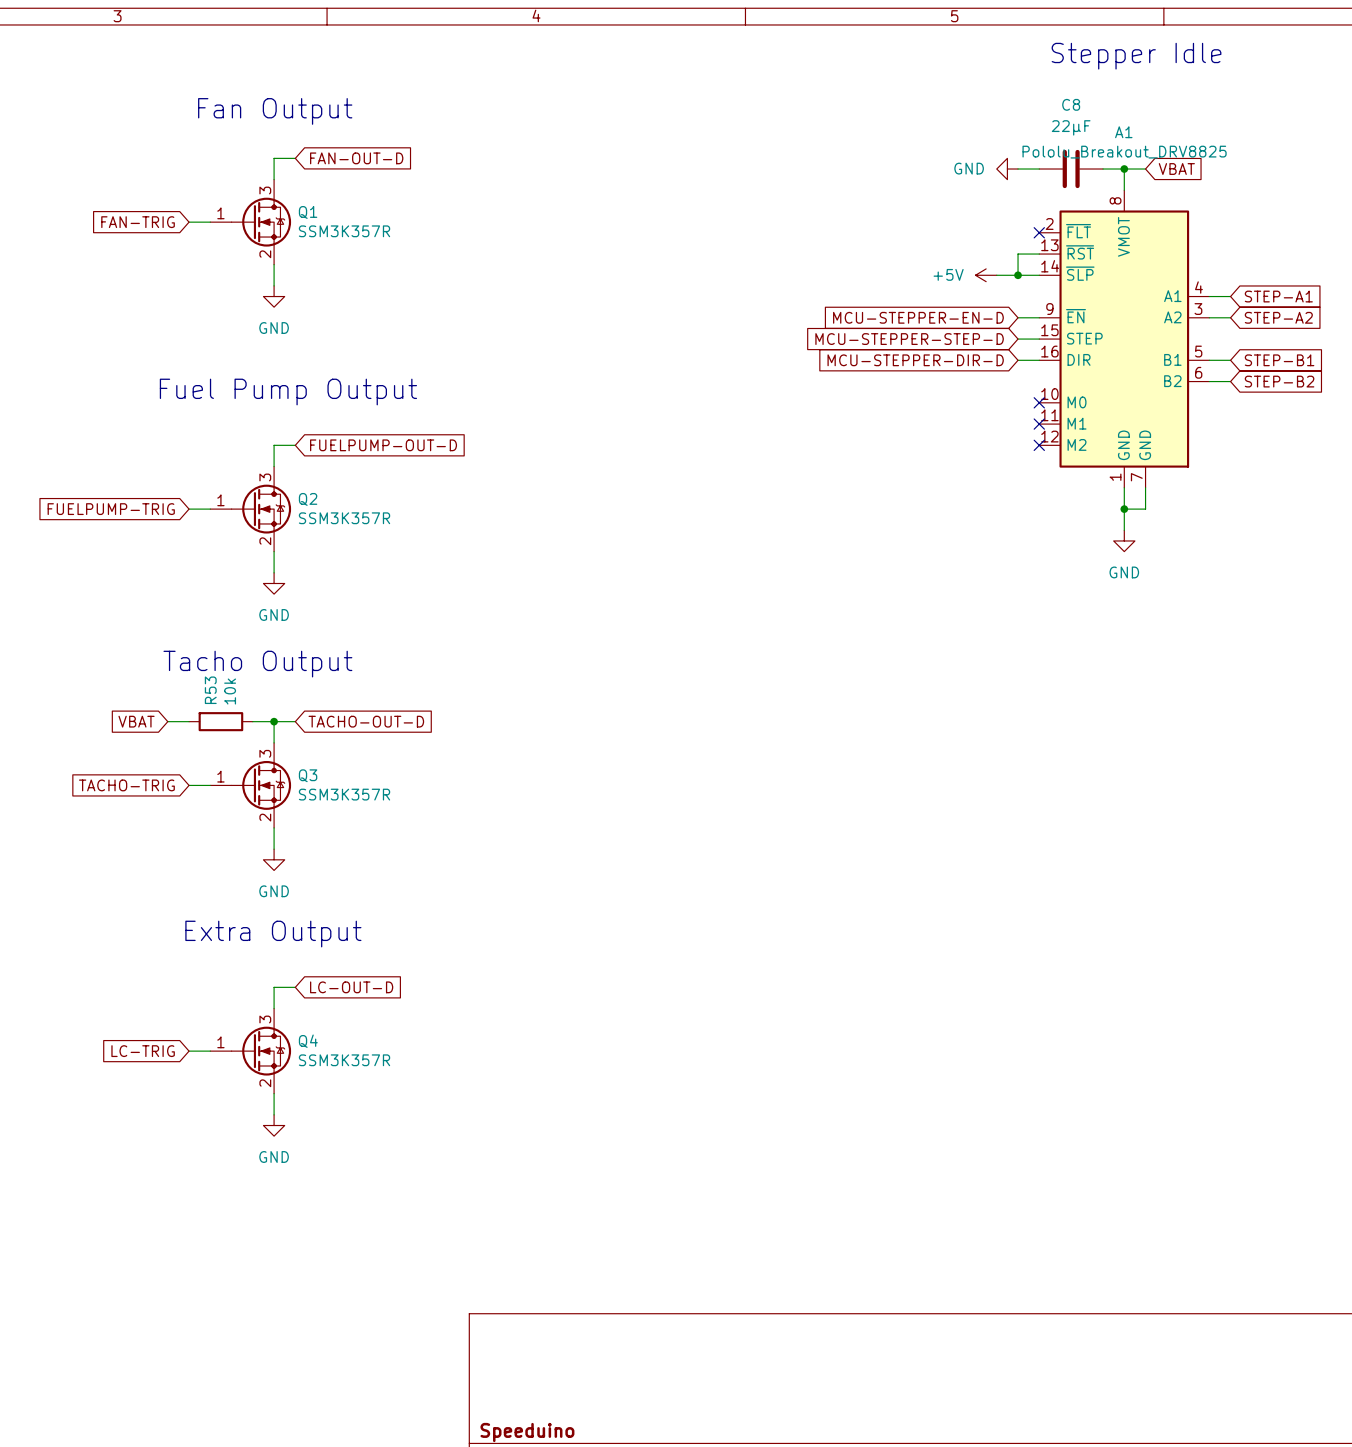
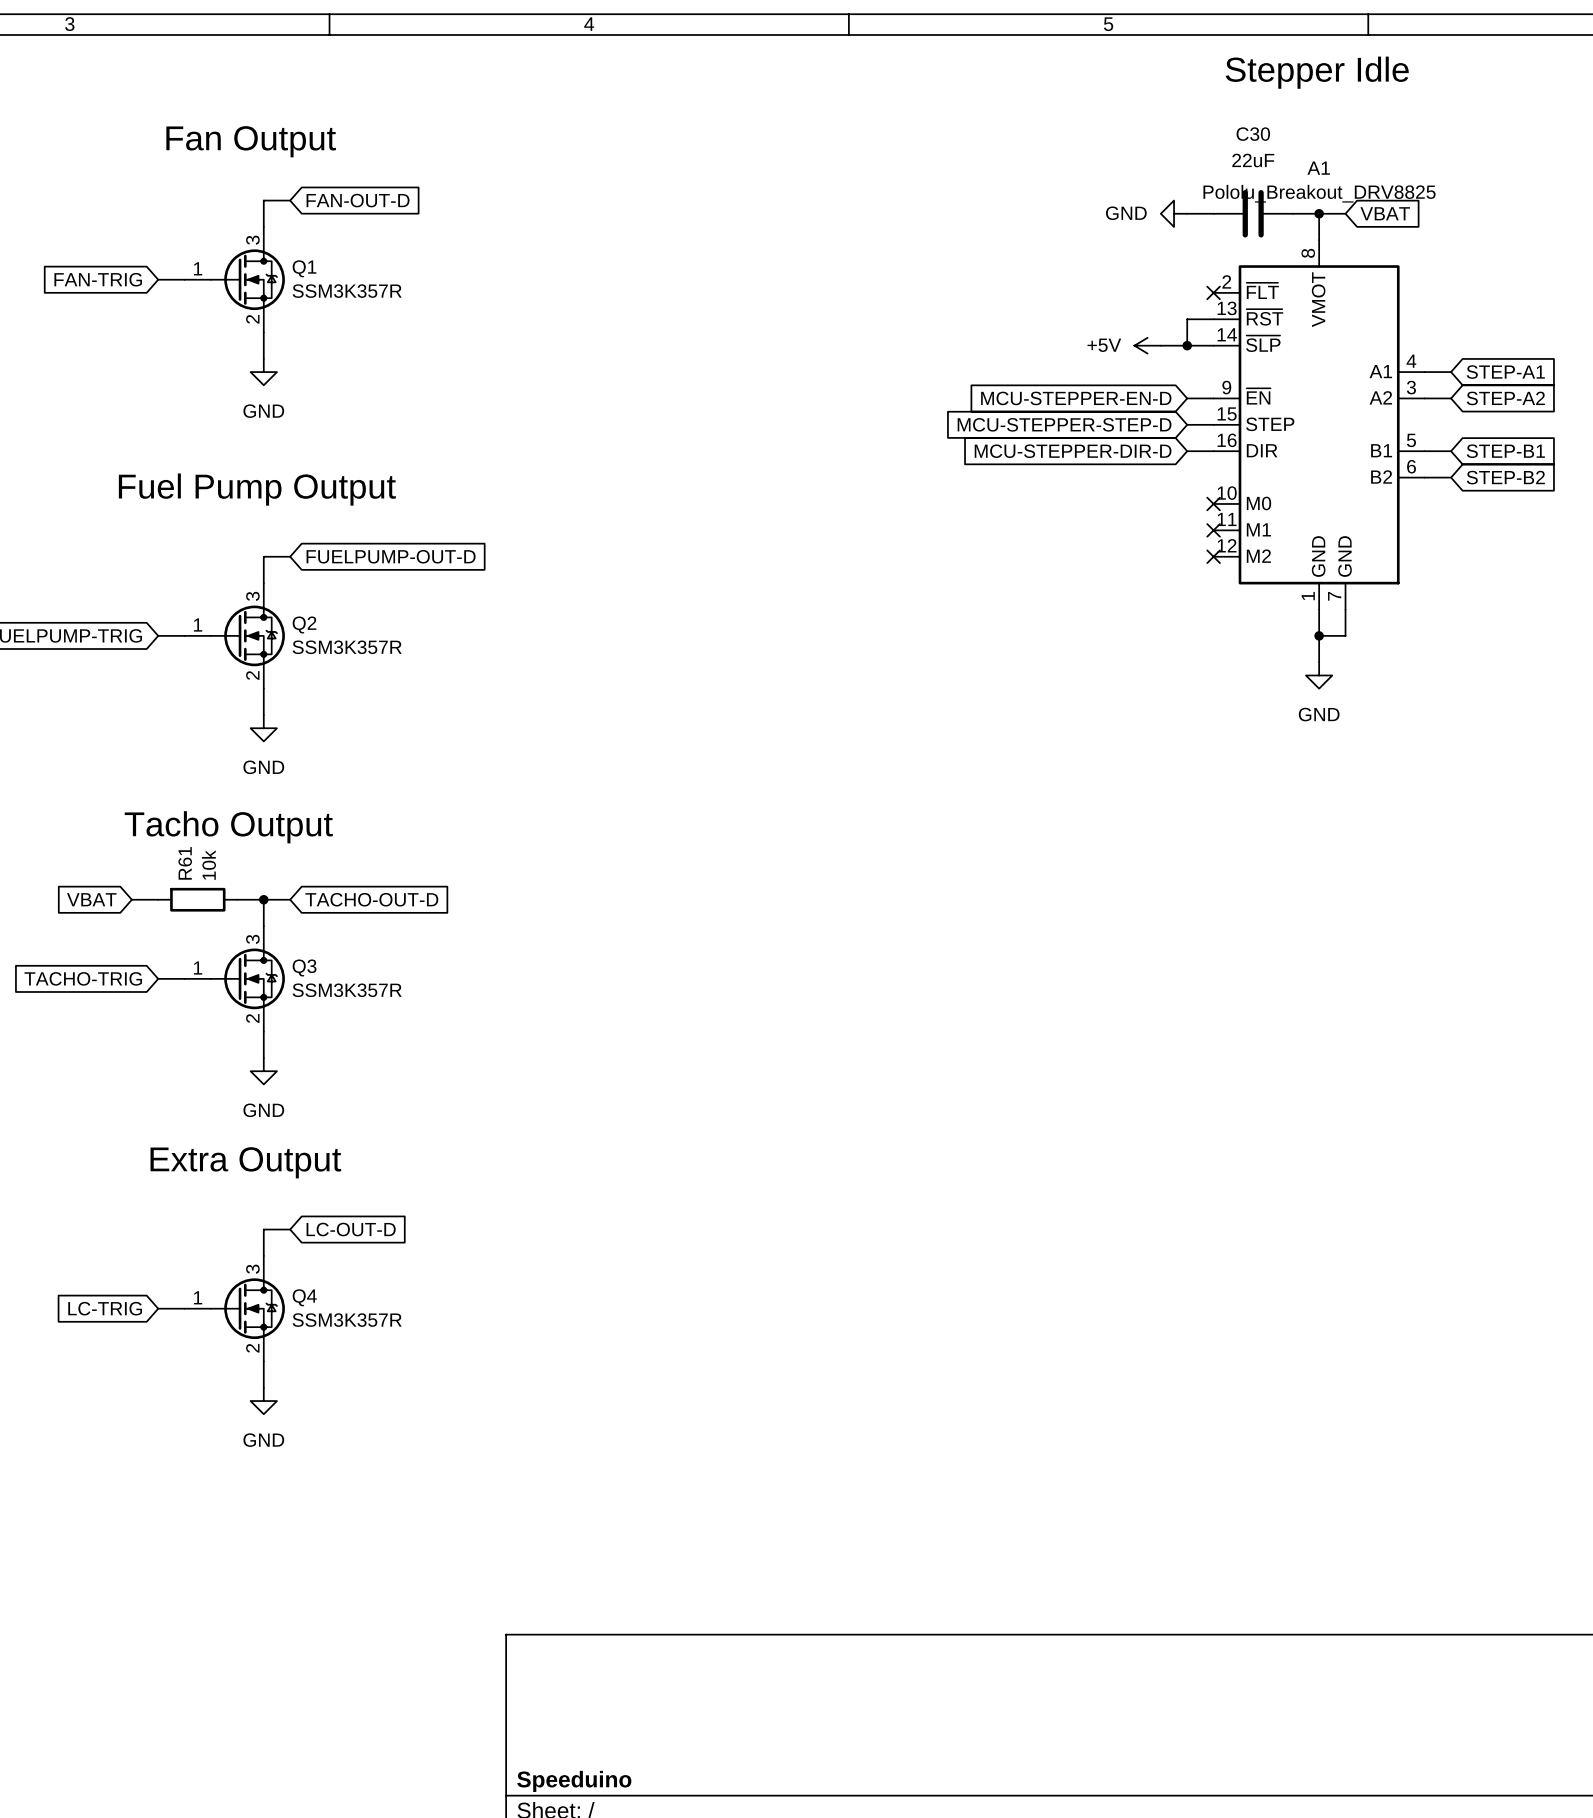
C8 name: C8 (1071, 104) -> C30 (1253, 134)
C8 value: 22µF (1071, 127) -> 22uF (1253, 160)
R53 name: R53 (210, 690) -> R61 (185, 863)

